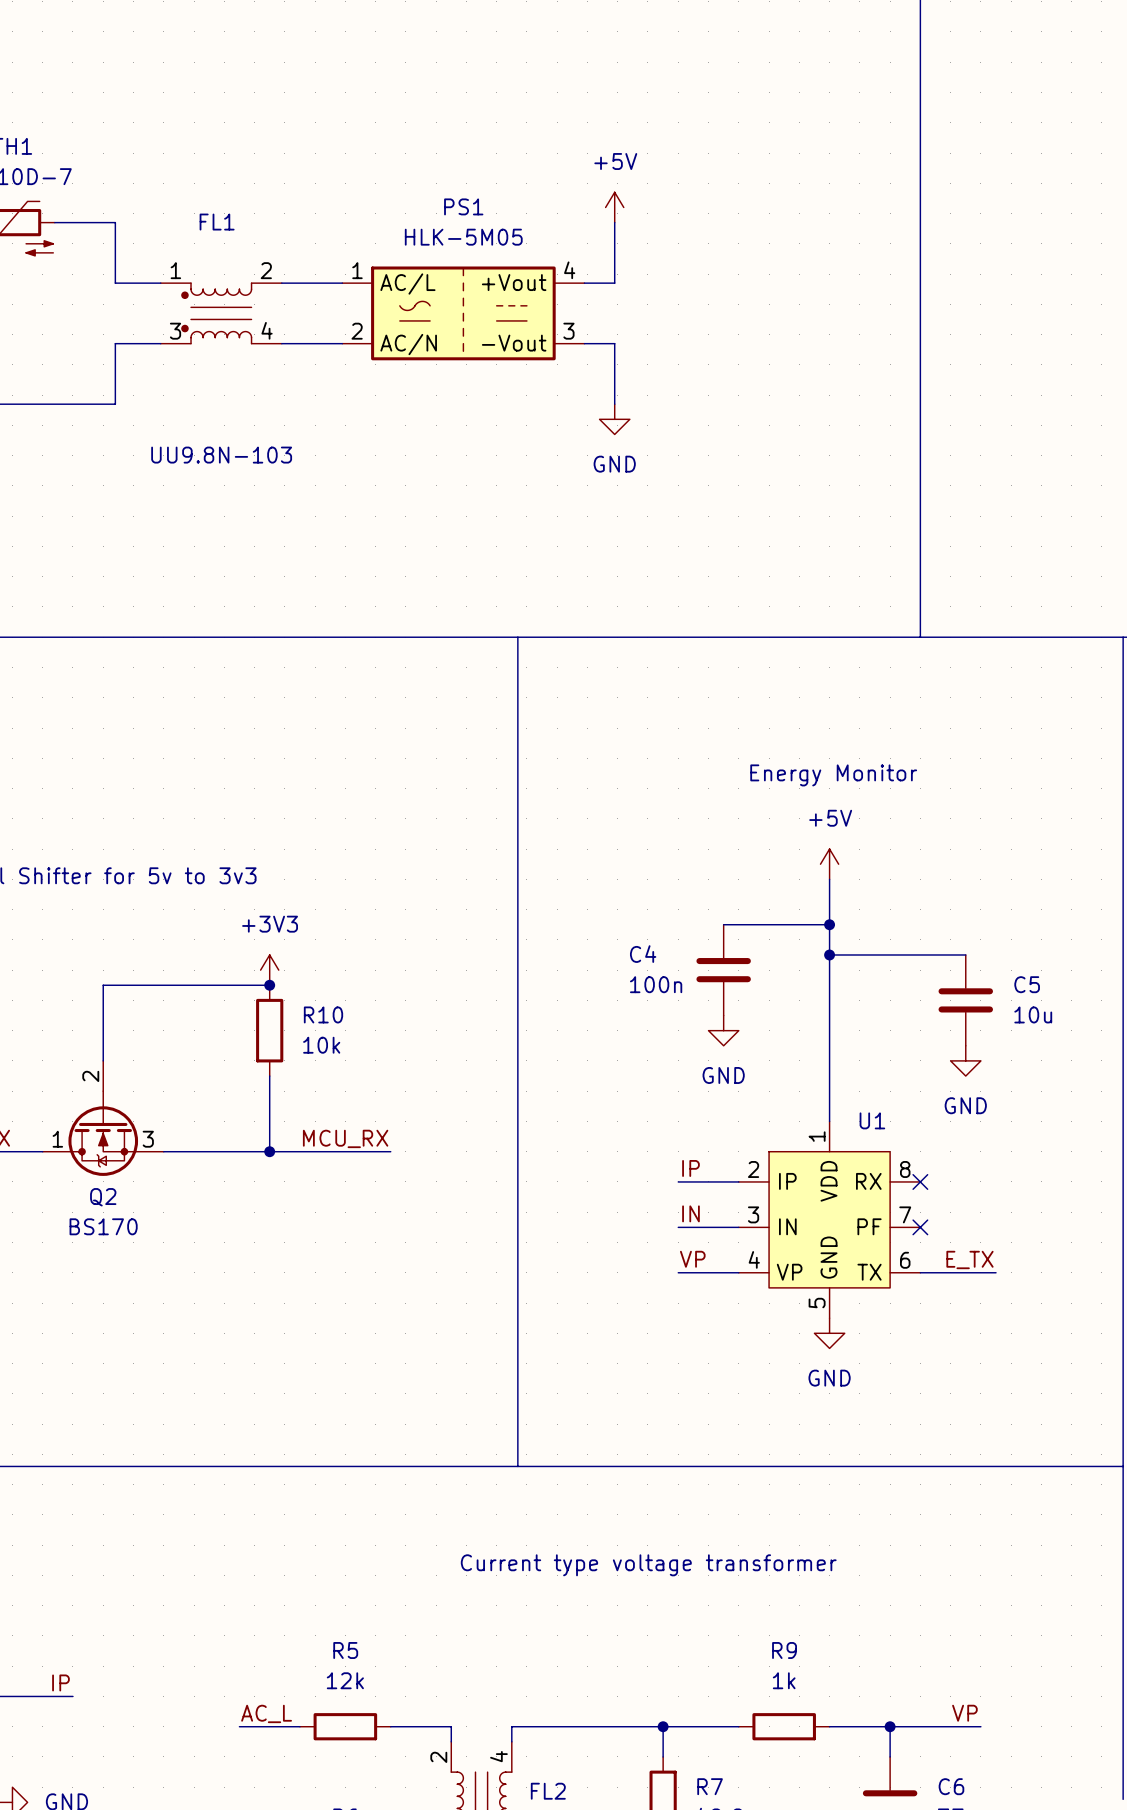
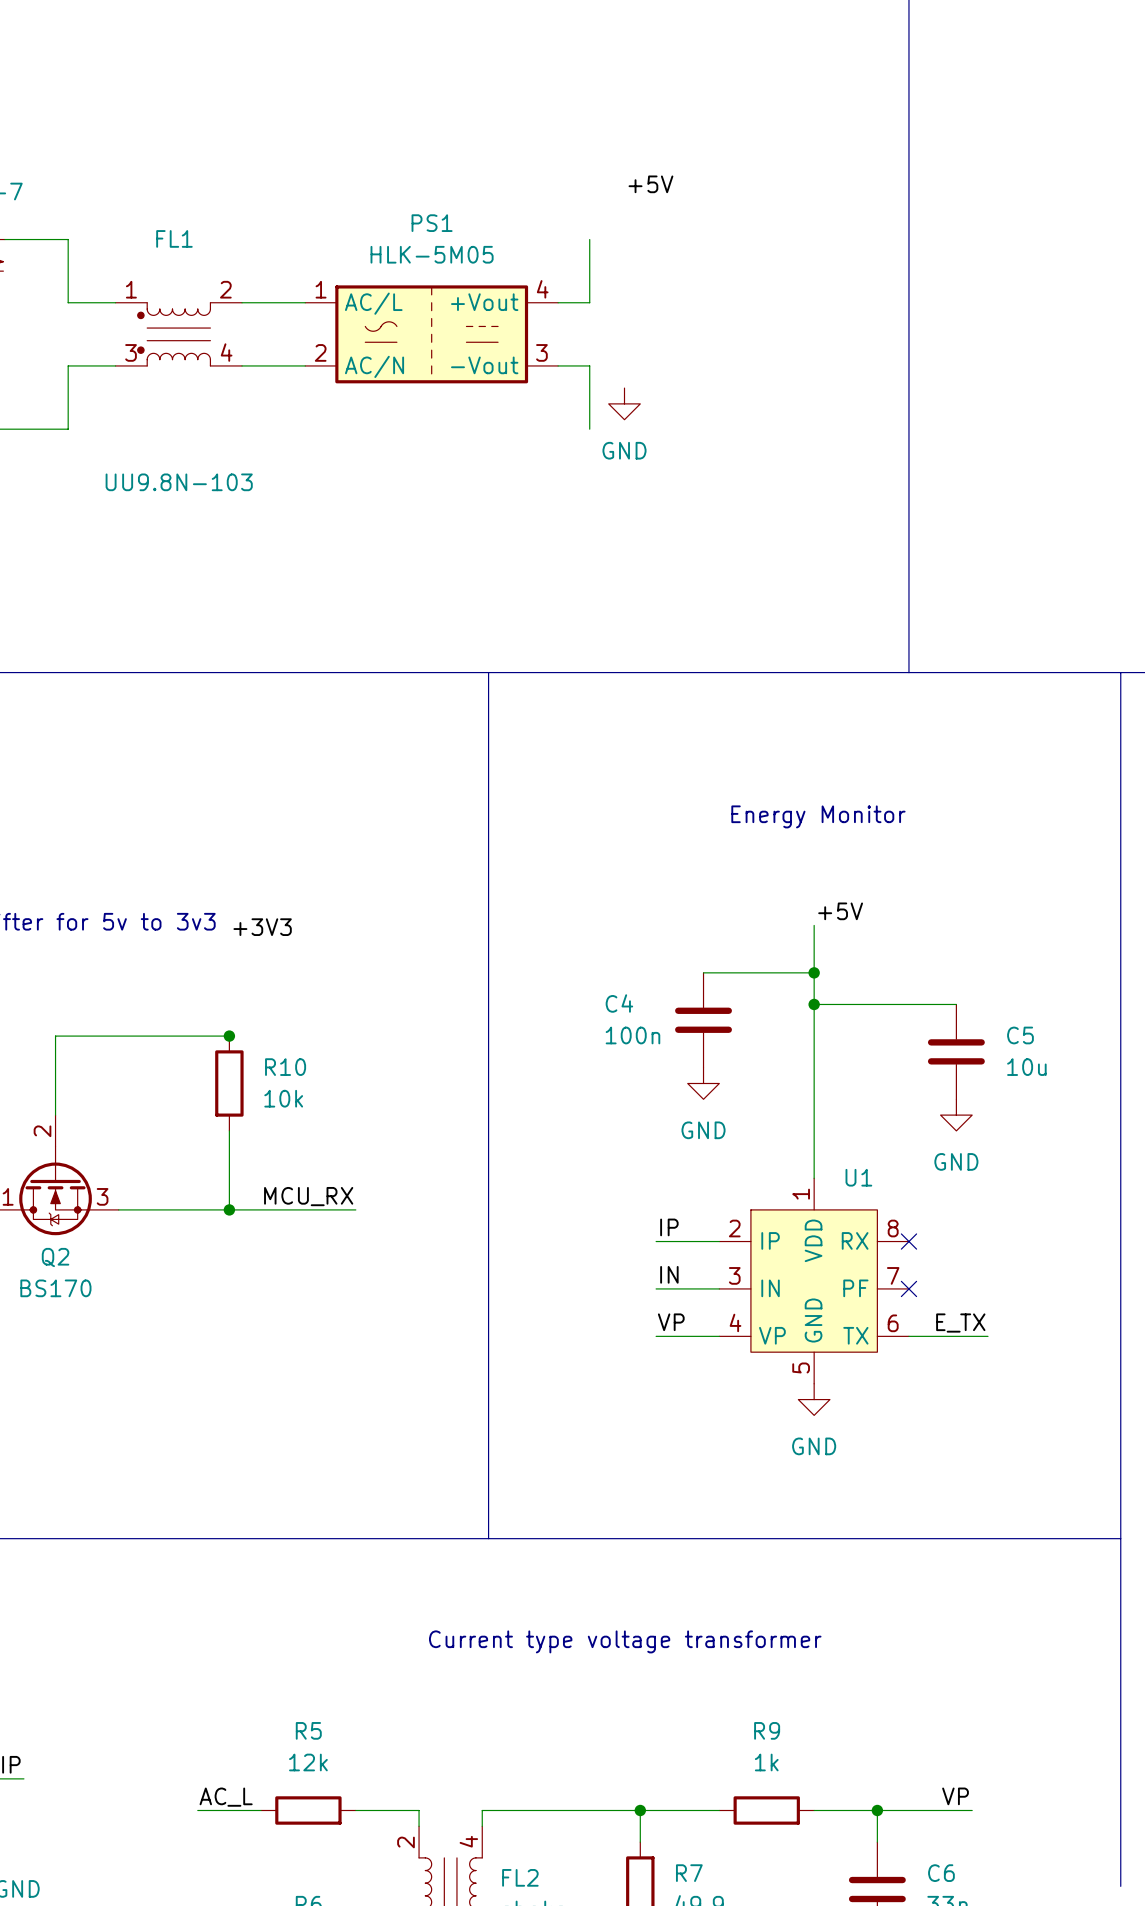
label: none -> +5V (650, 184)
power symbol: +5V (614, 207) -> none
power symbol position: GND (614, 419) -> GND (624, 403)
power symbol: +5V (829, 864) -> none
label: none -> +5V (840, 911)
label: none -> +3V3 (262, 927)
power symbol: +3V3 (269, 970) -> none

